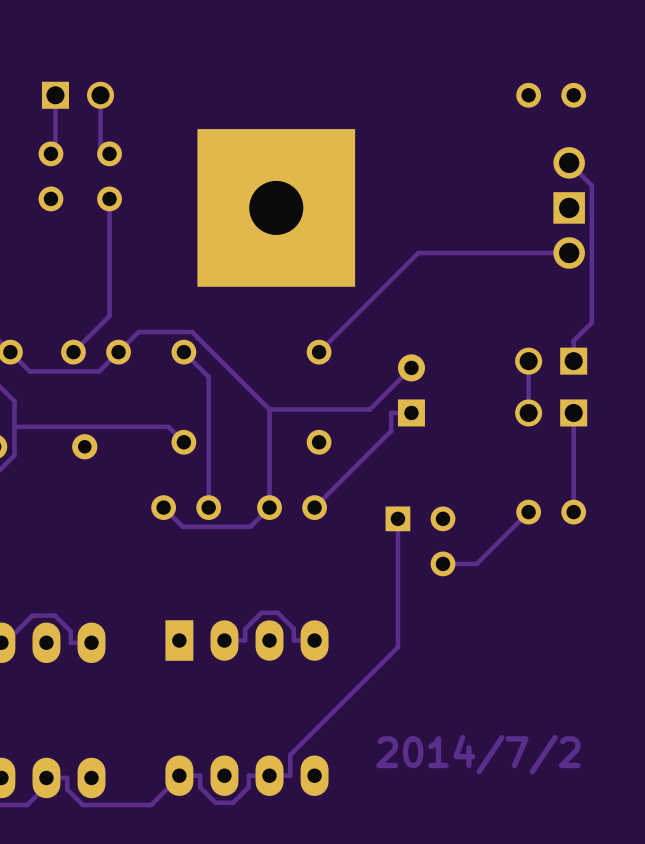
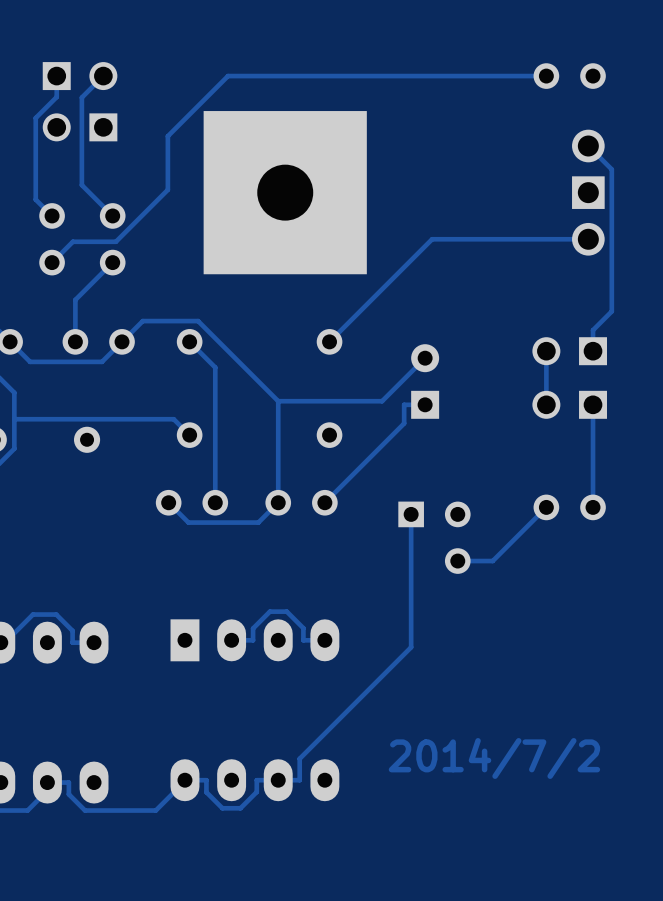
track: (100, 95) (100, 144) (109, 153) -> (103, 76) (81, 97) (81, 185) (112, 215)
track: none -> (546, 76) (228, 76) (167, 136) (167, 189) (115, 241) (72, 241) (52, 262)
track: (55, 115) (55, 149) (50, 153) -> (56, 97) (35, 118) (35, 199) (52, 215)
part: none -> (80, 127)
part: (50, 176) -> none
part: (109, 176) -> none
track: (109, 198) (109, 316) (73, 352) -> (112, 262) (75, 299) (75, 341)
part: none -> (52, 239)
part: none -> (112, 239)

